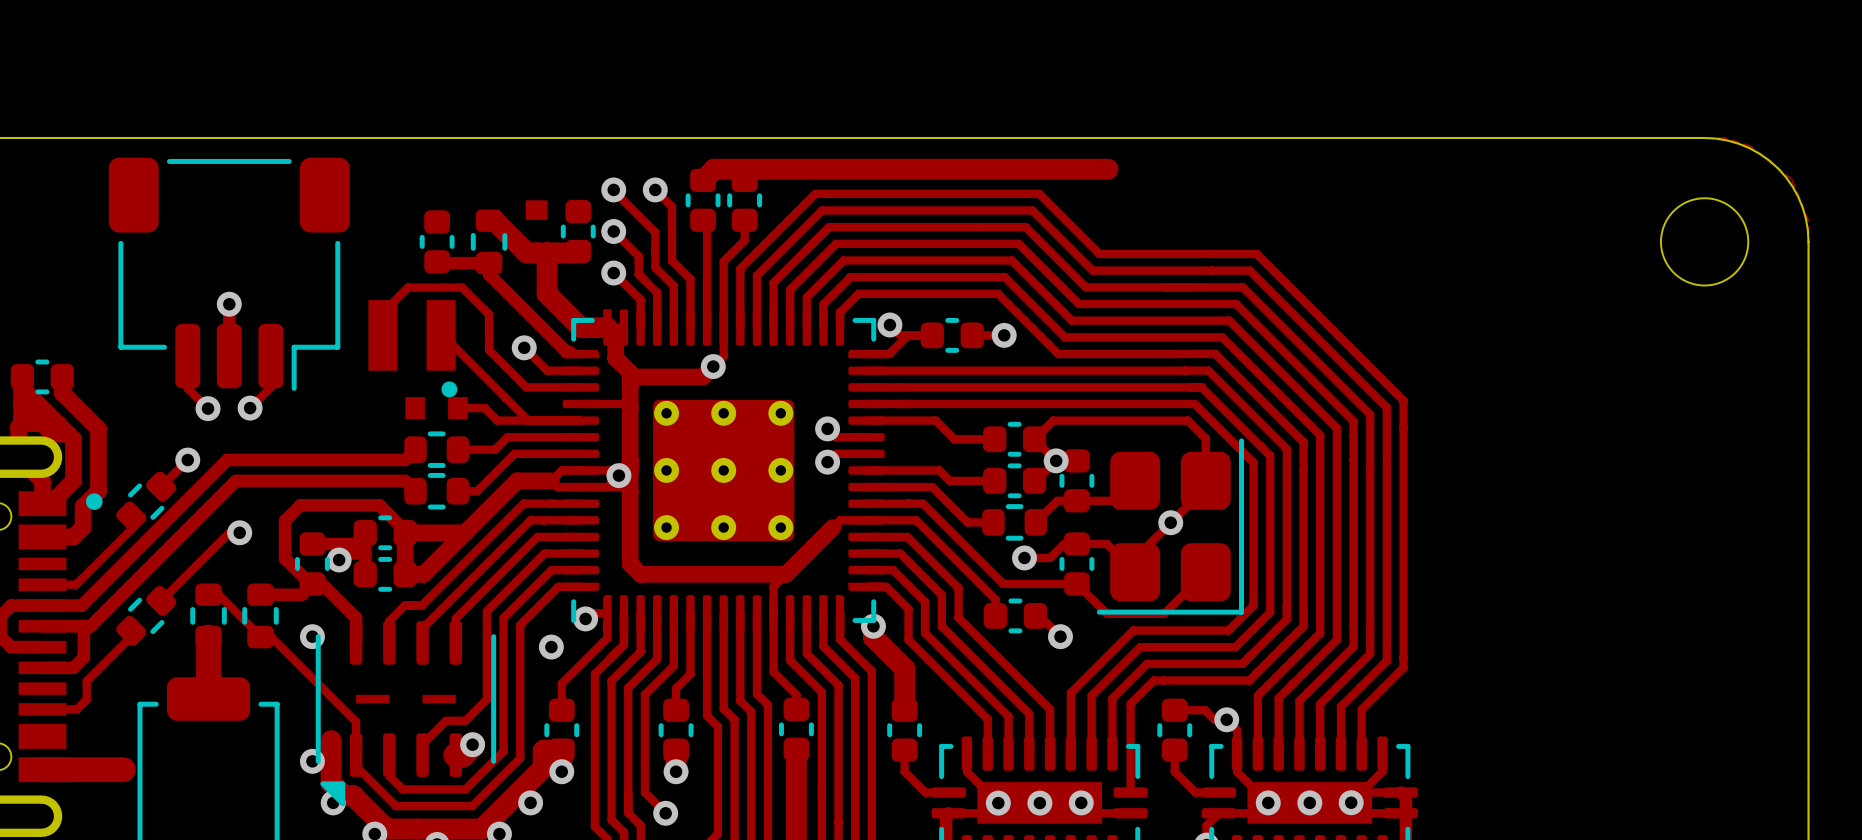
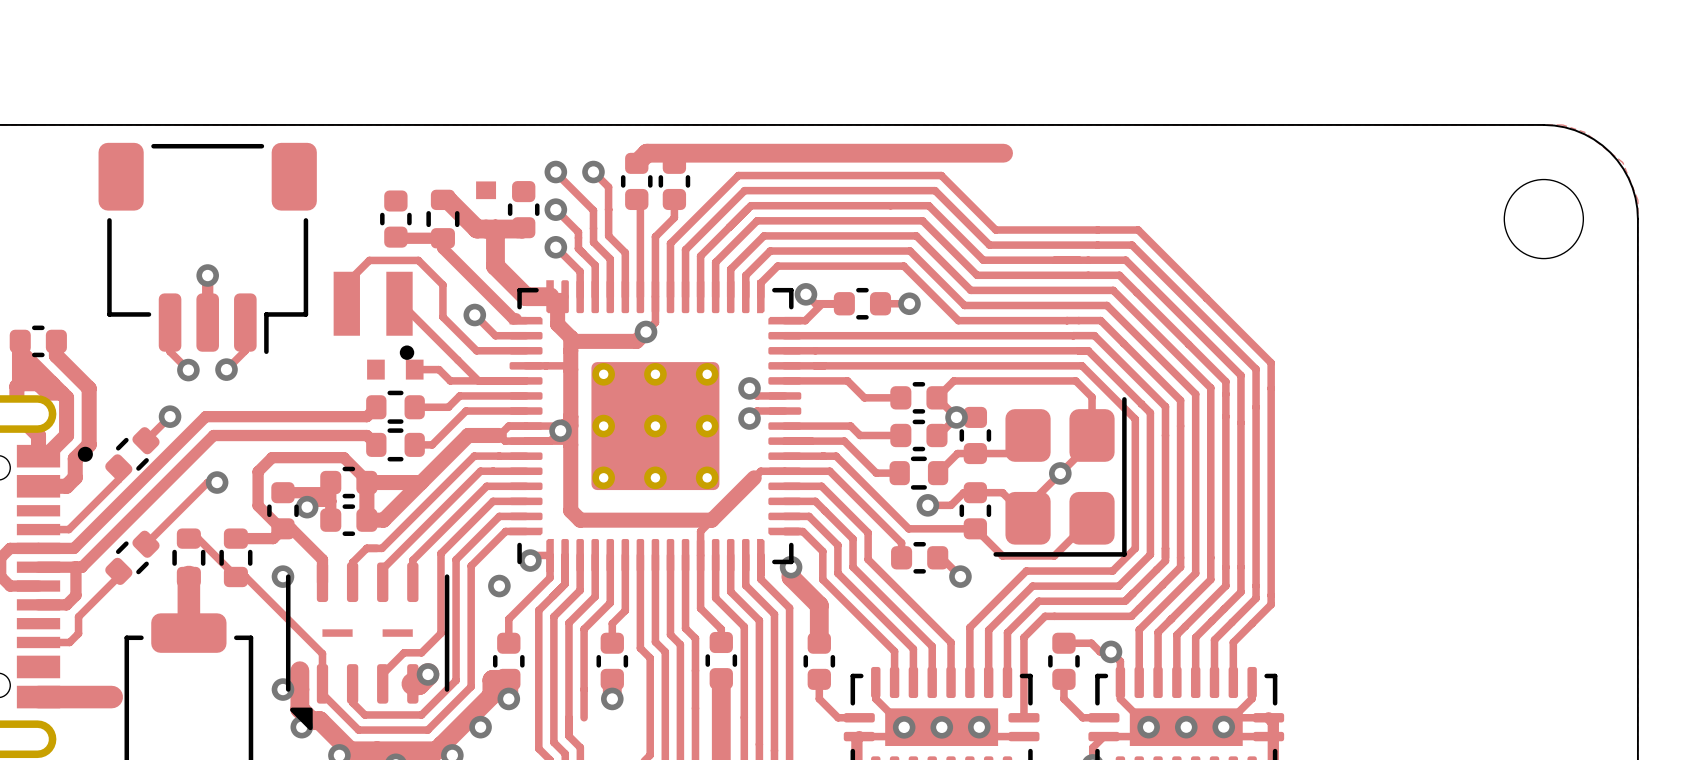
track: (644, 792) (665, 813) -> none
via: (665, 813) -> none

